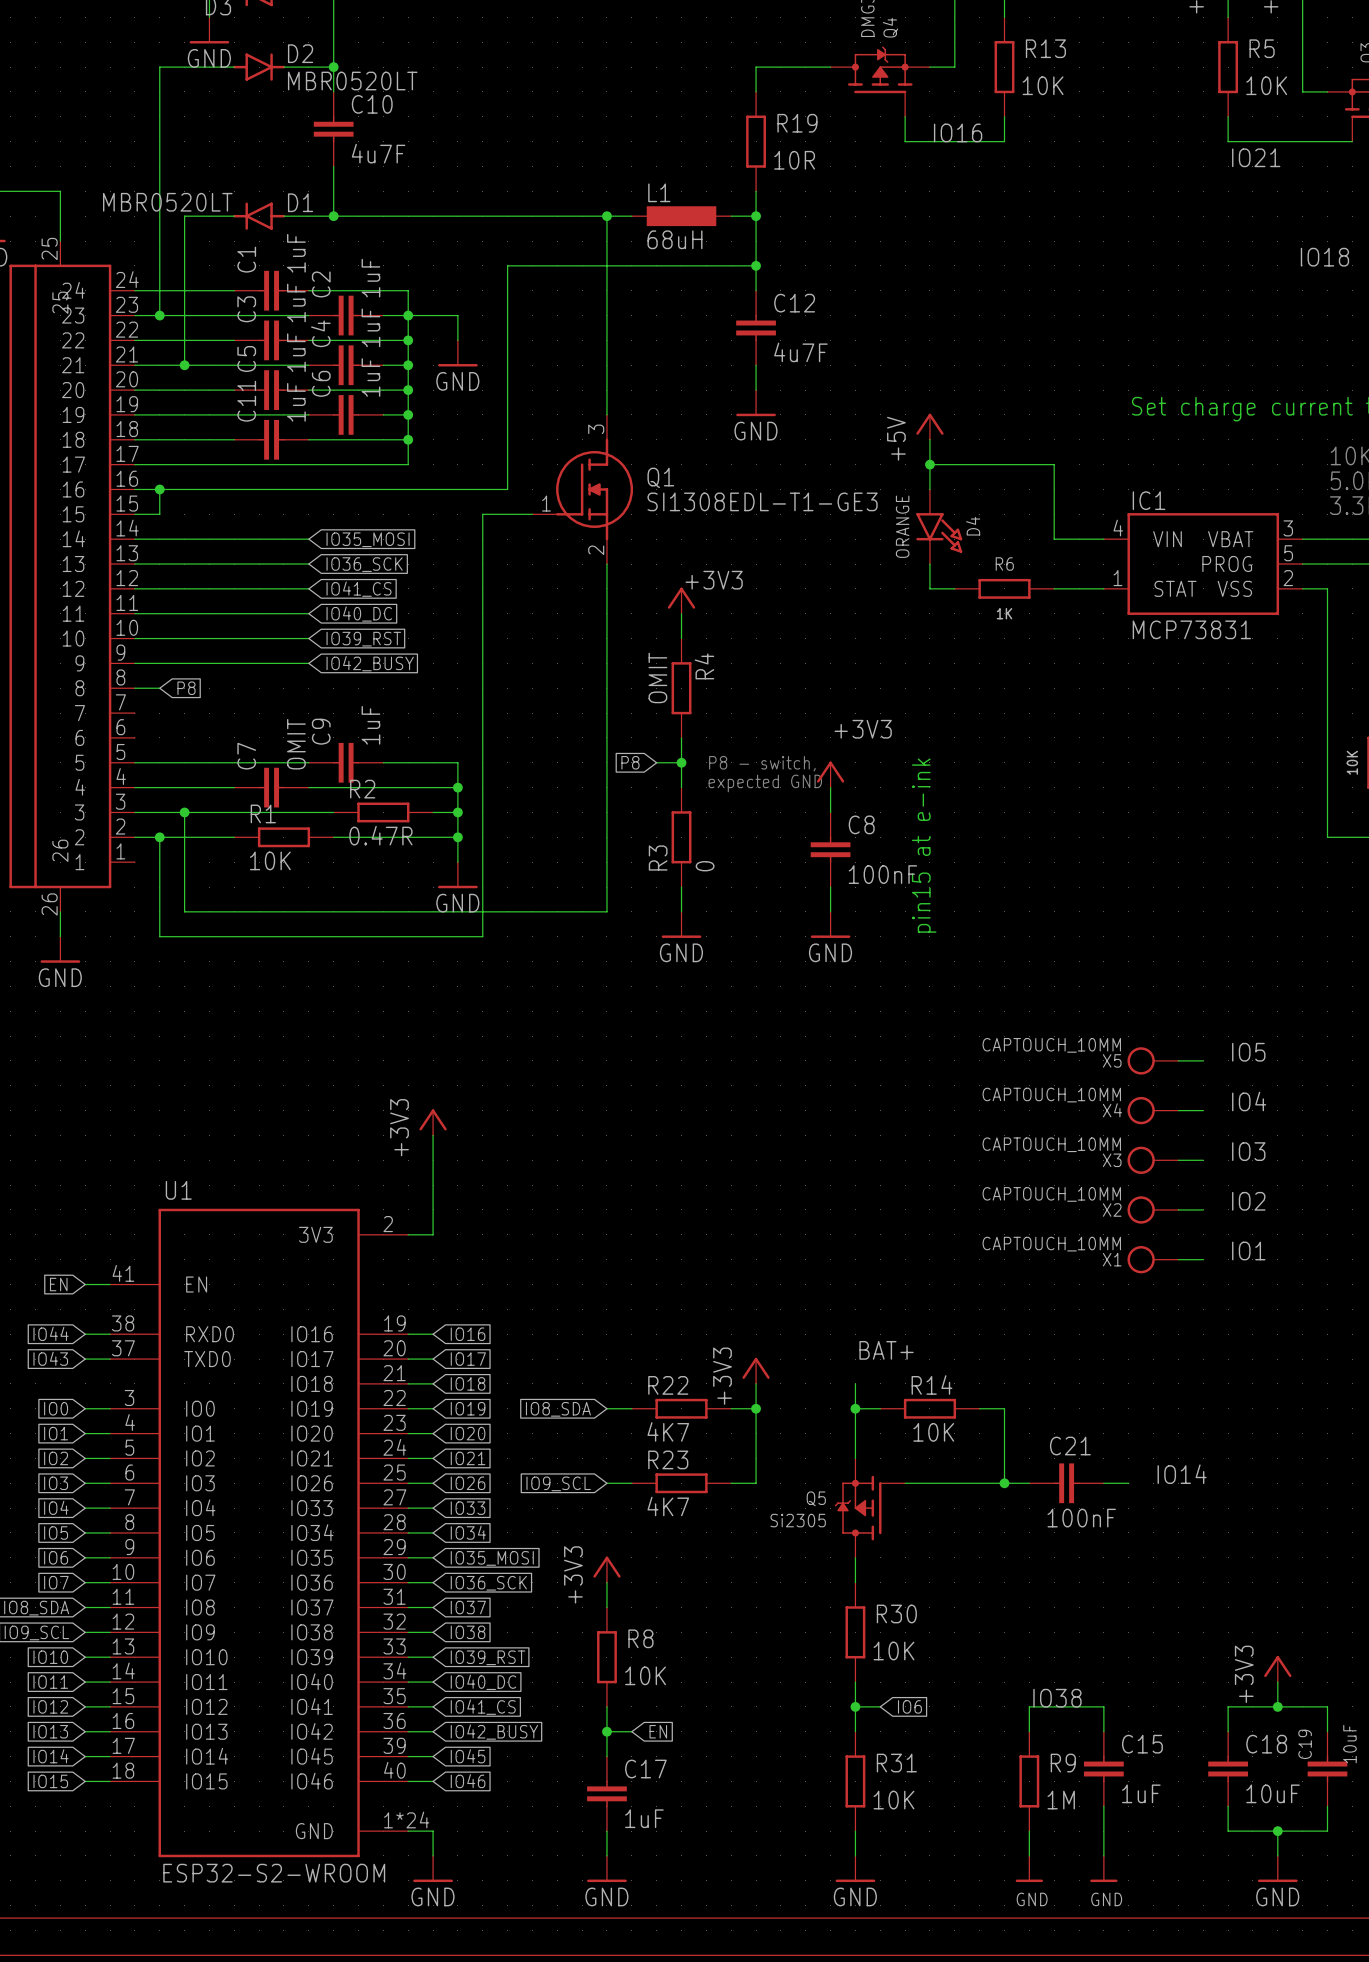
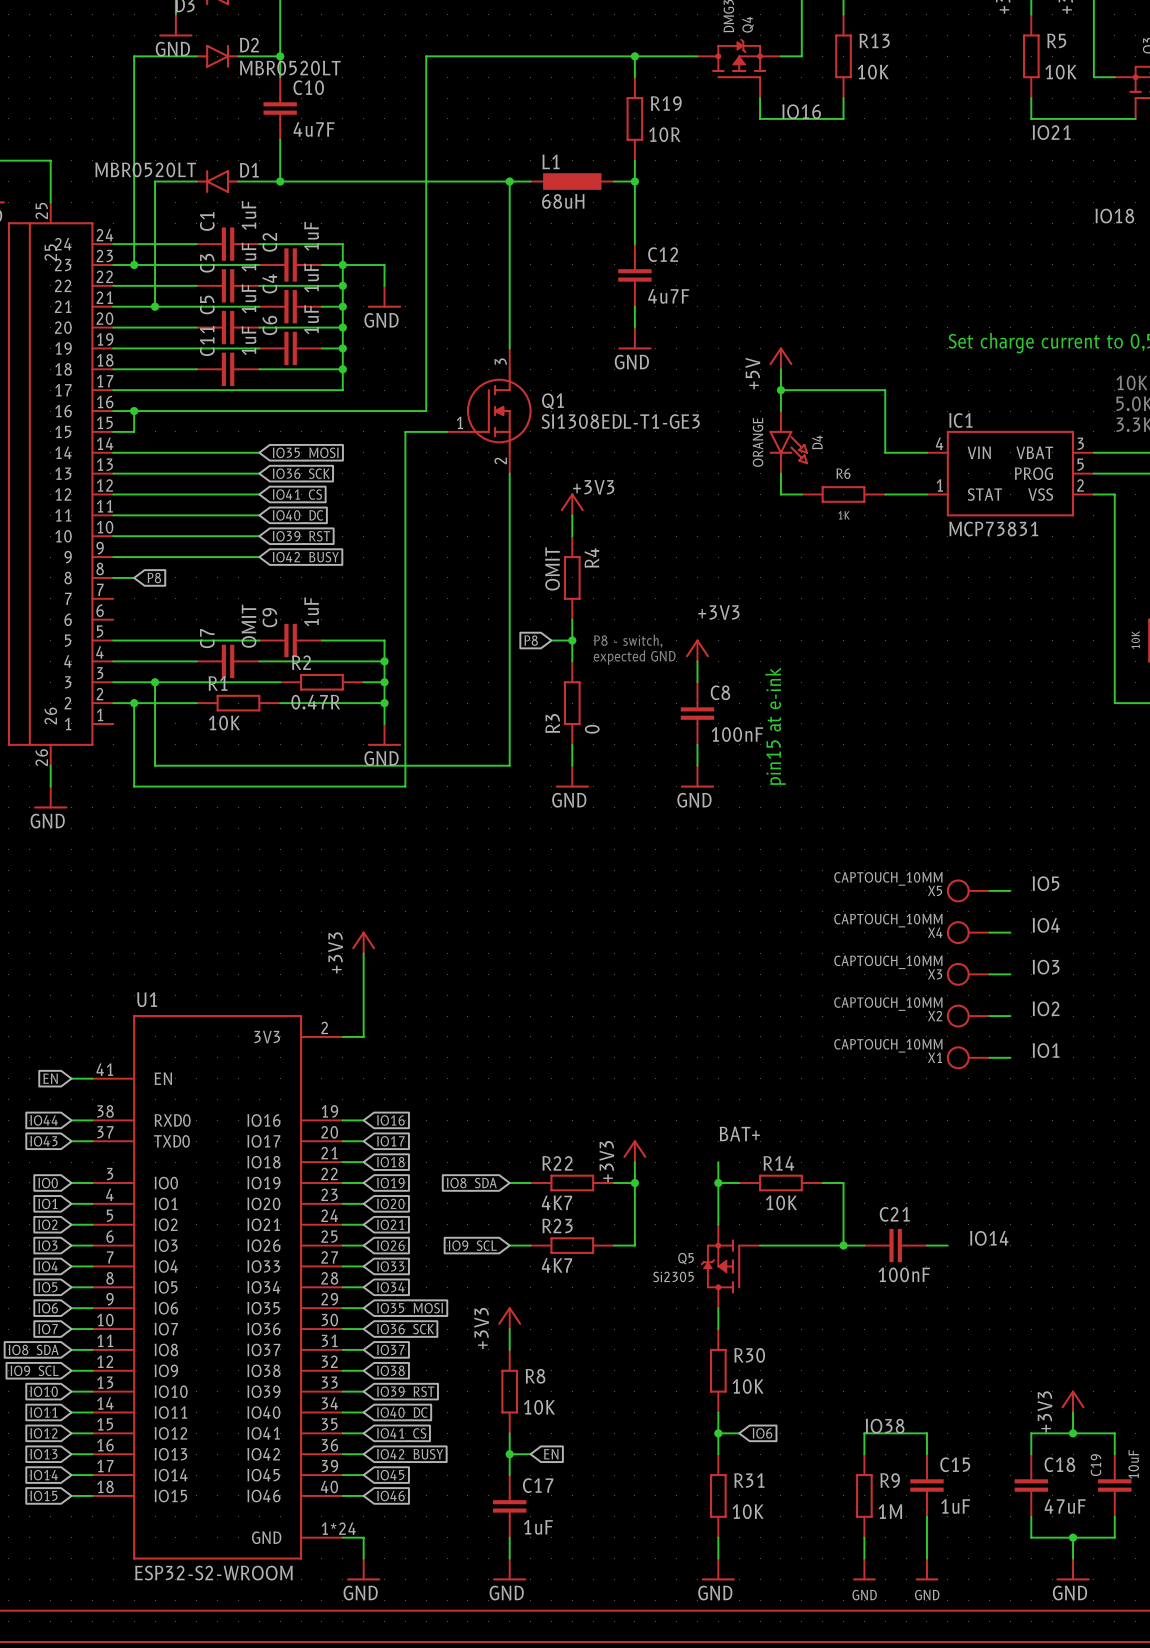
junction: none -> (634, 56)
wire: (507, 265) (756, 265) -> (426, 223) (426, 56) (634, 56)
junction: (756, 265) -> none
C18 value: 10uF (1273, 1793) -> 47uF (1065, 1506)

